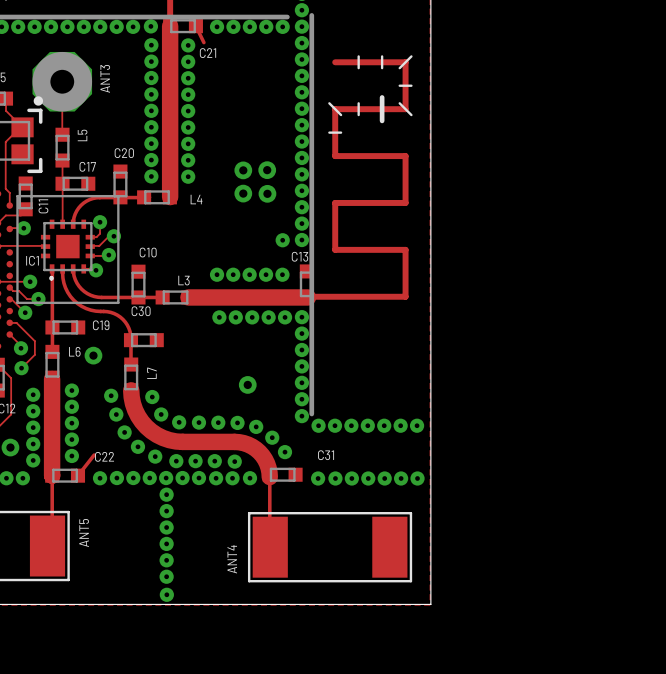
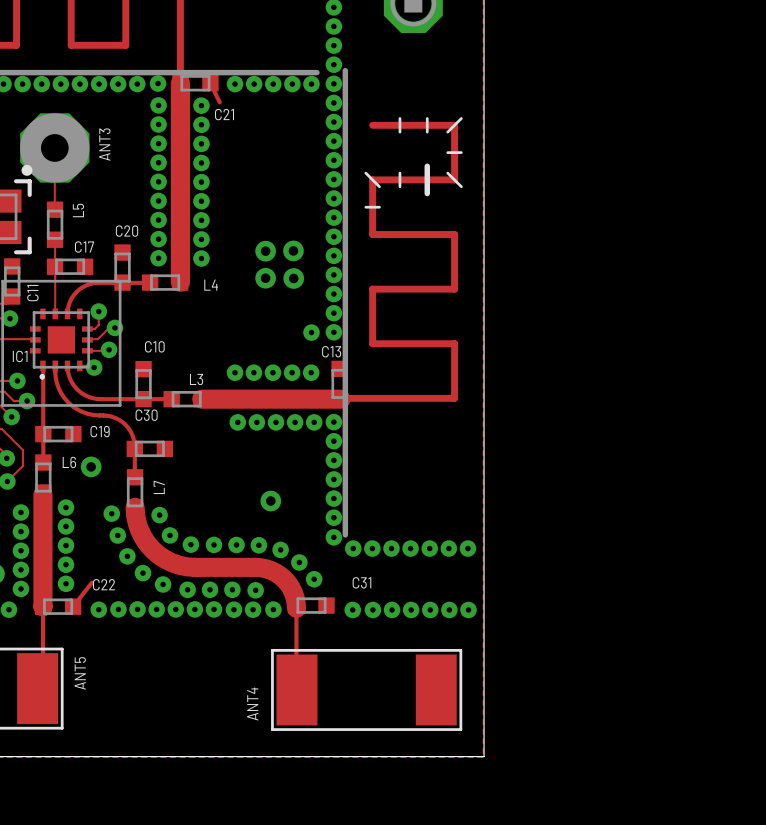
via: (166, 494) -> none
via: (166, 511) -> none
via: (166, 527) -> none
via: (166, 543) -> none
via: (166, 560) -> none
via: (166, 576) -> none
via: (166, 594) -> none

